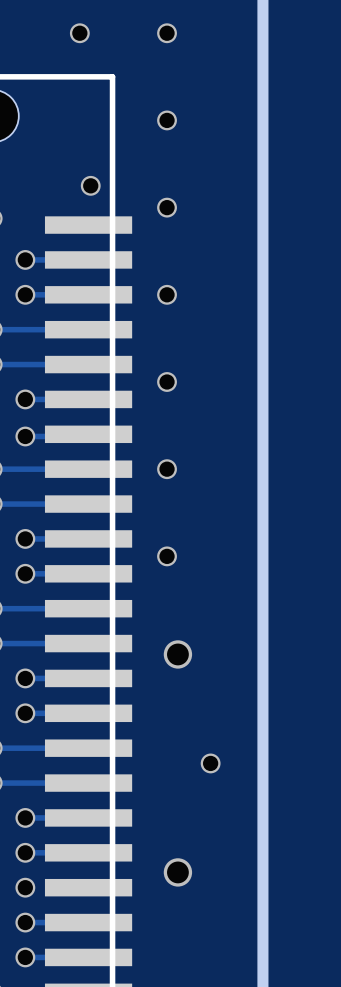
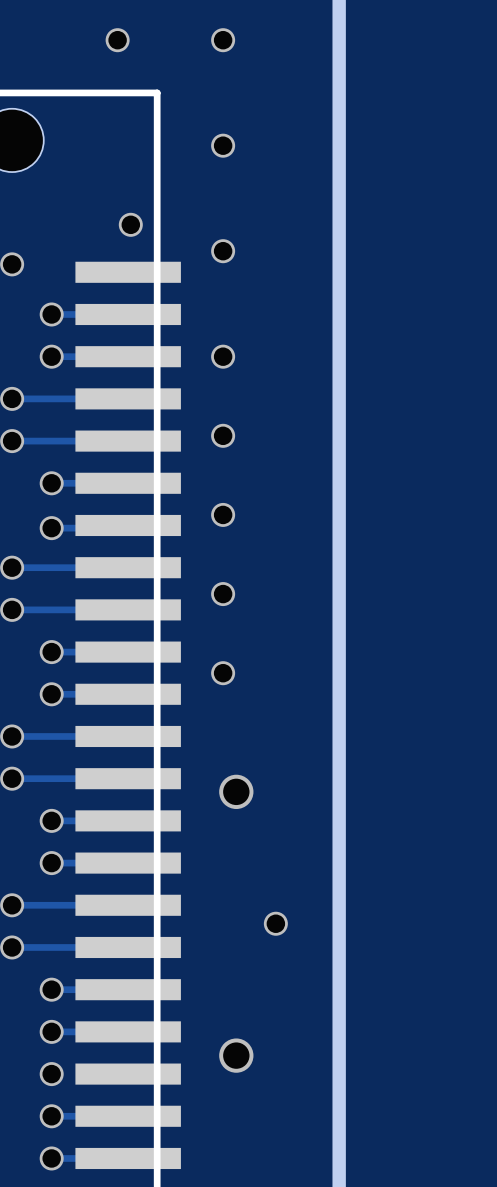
via: none -> (223, 435)
via: (167, 381) -> none
via: none -> (223, 514)
via: (167, 469) -> none
via: none -> (223, 594)

